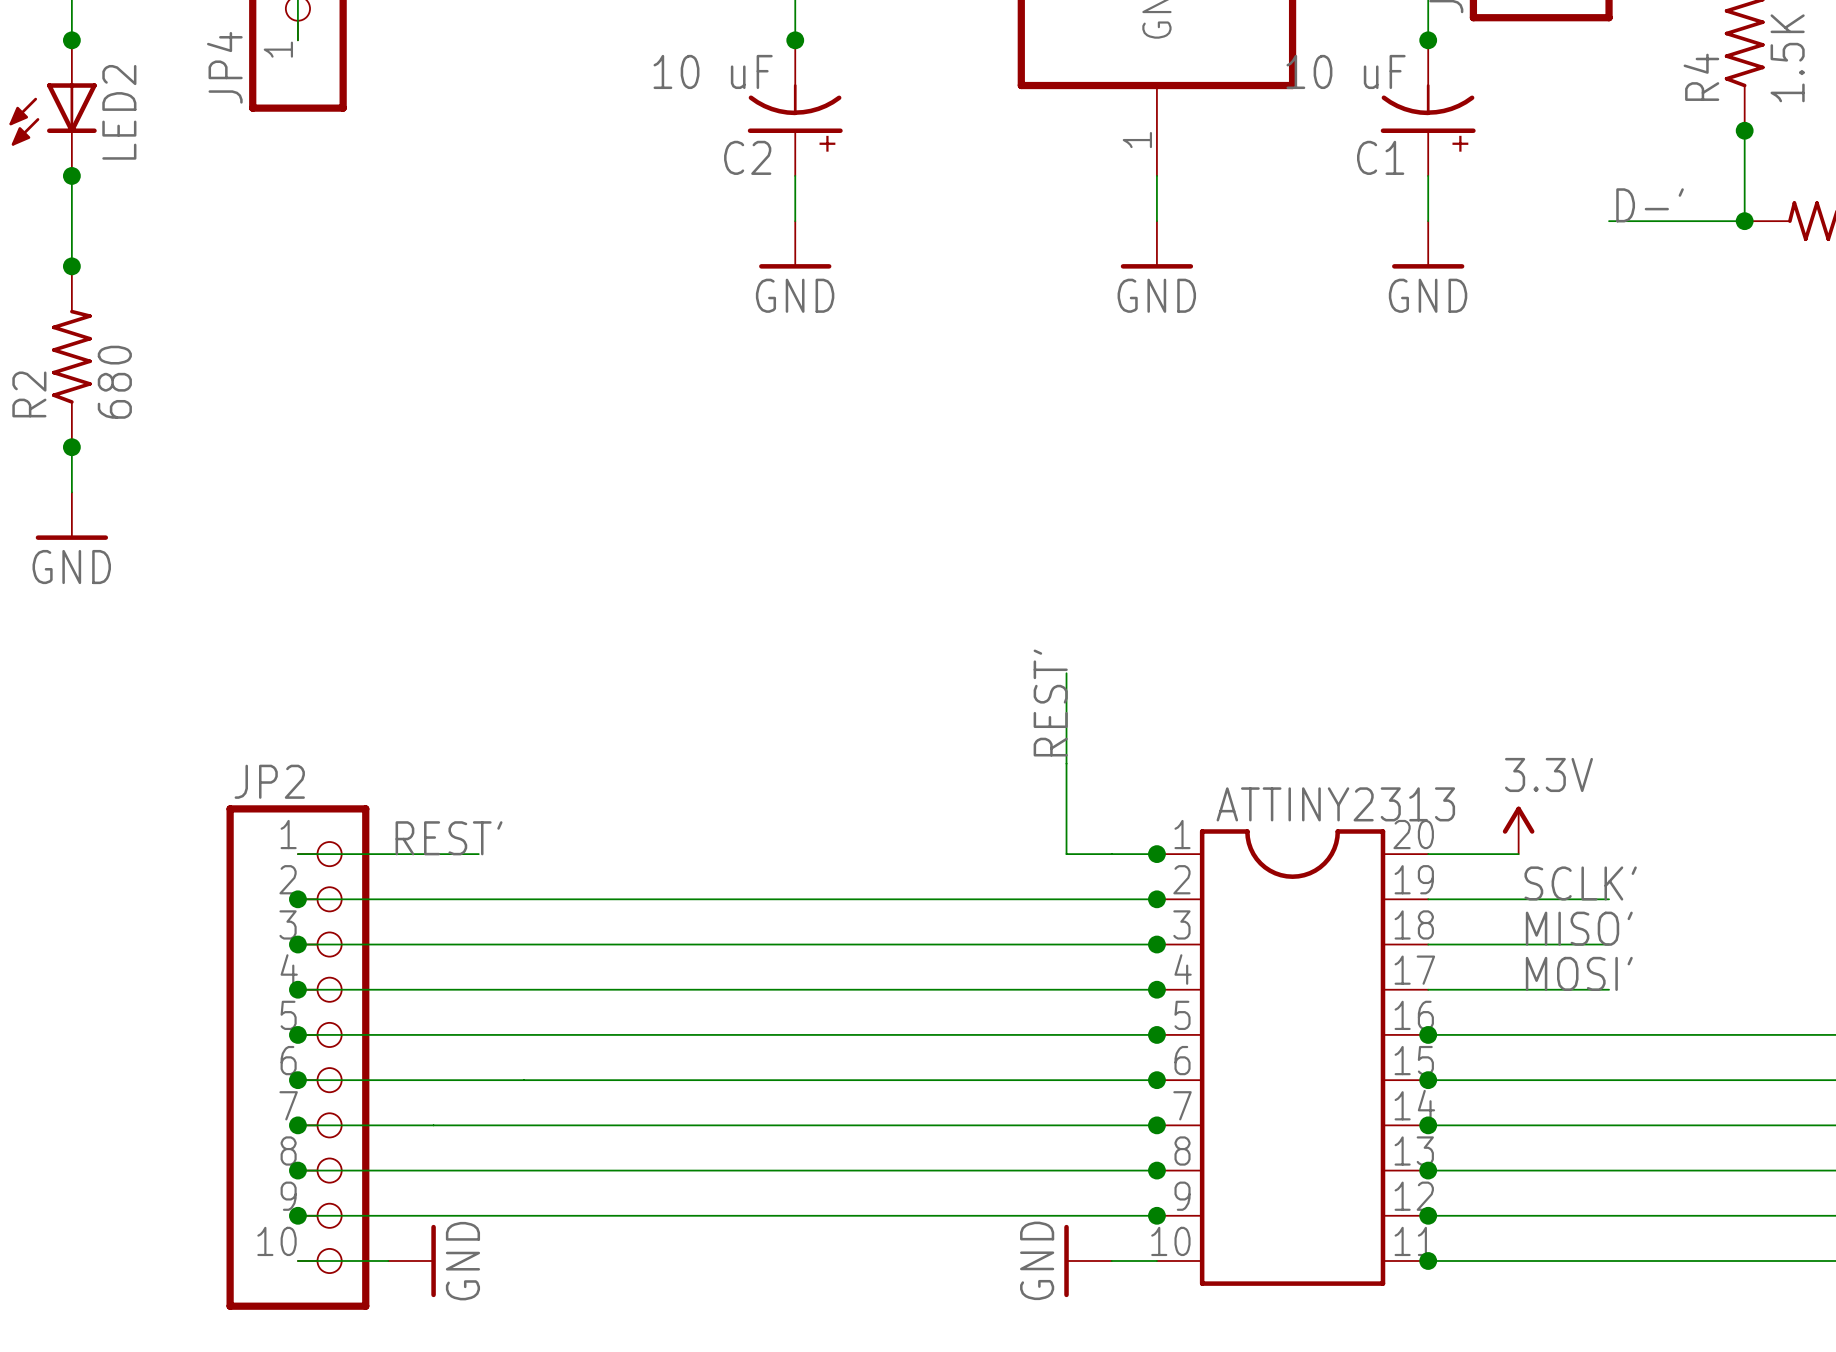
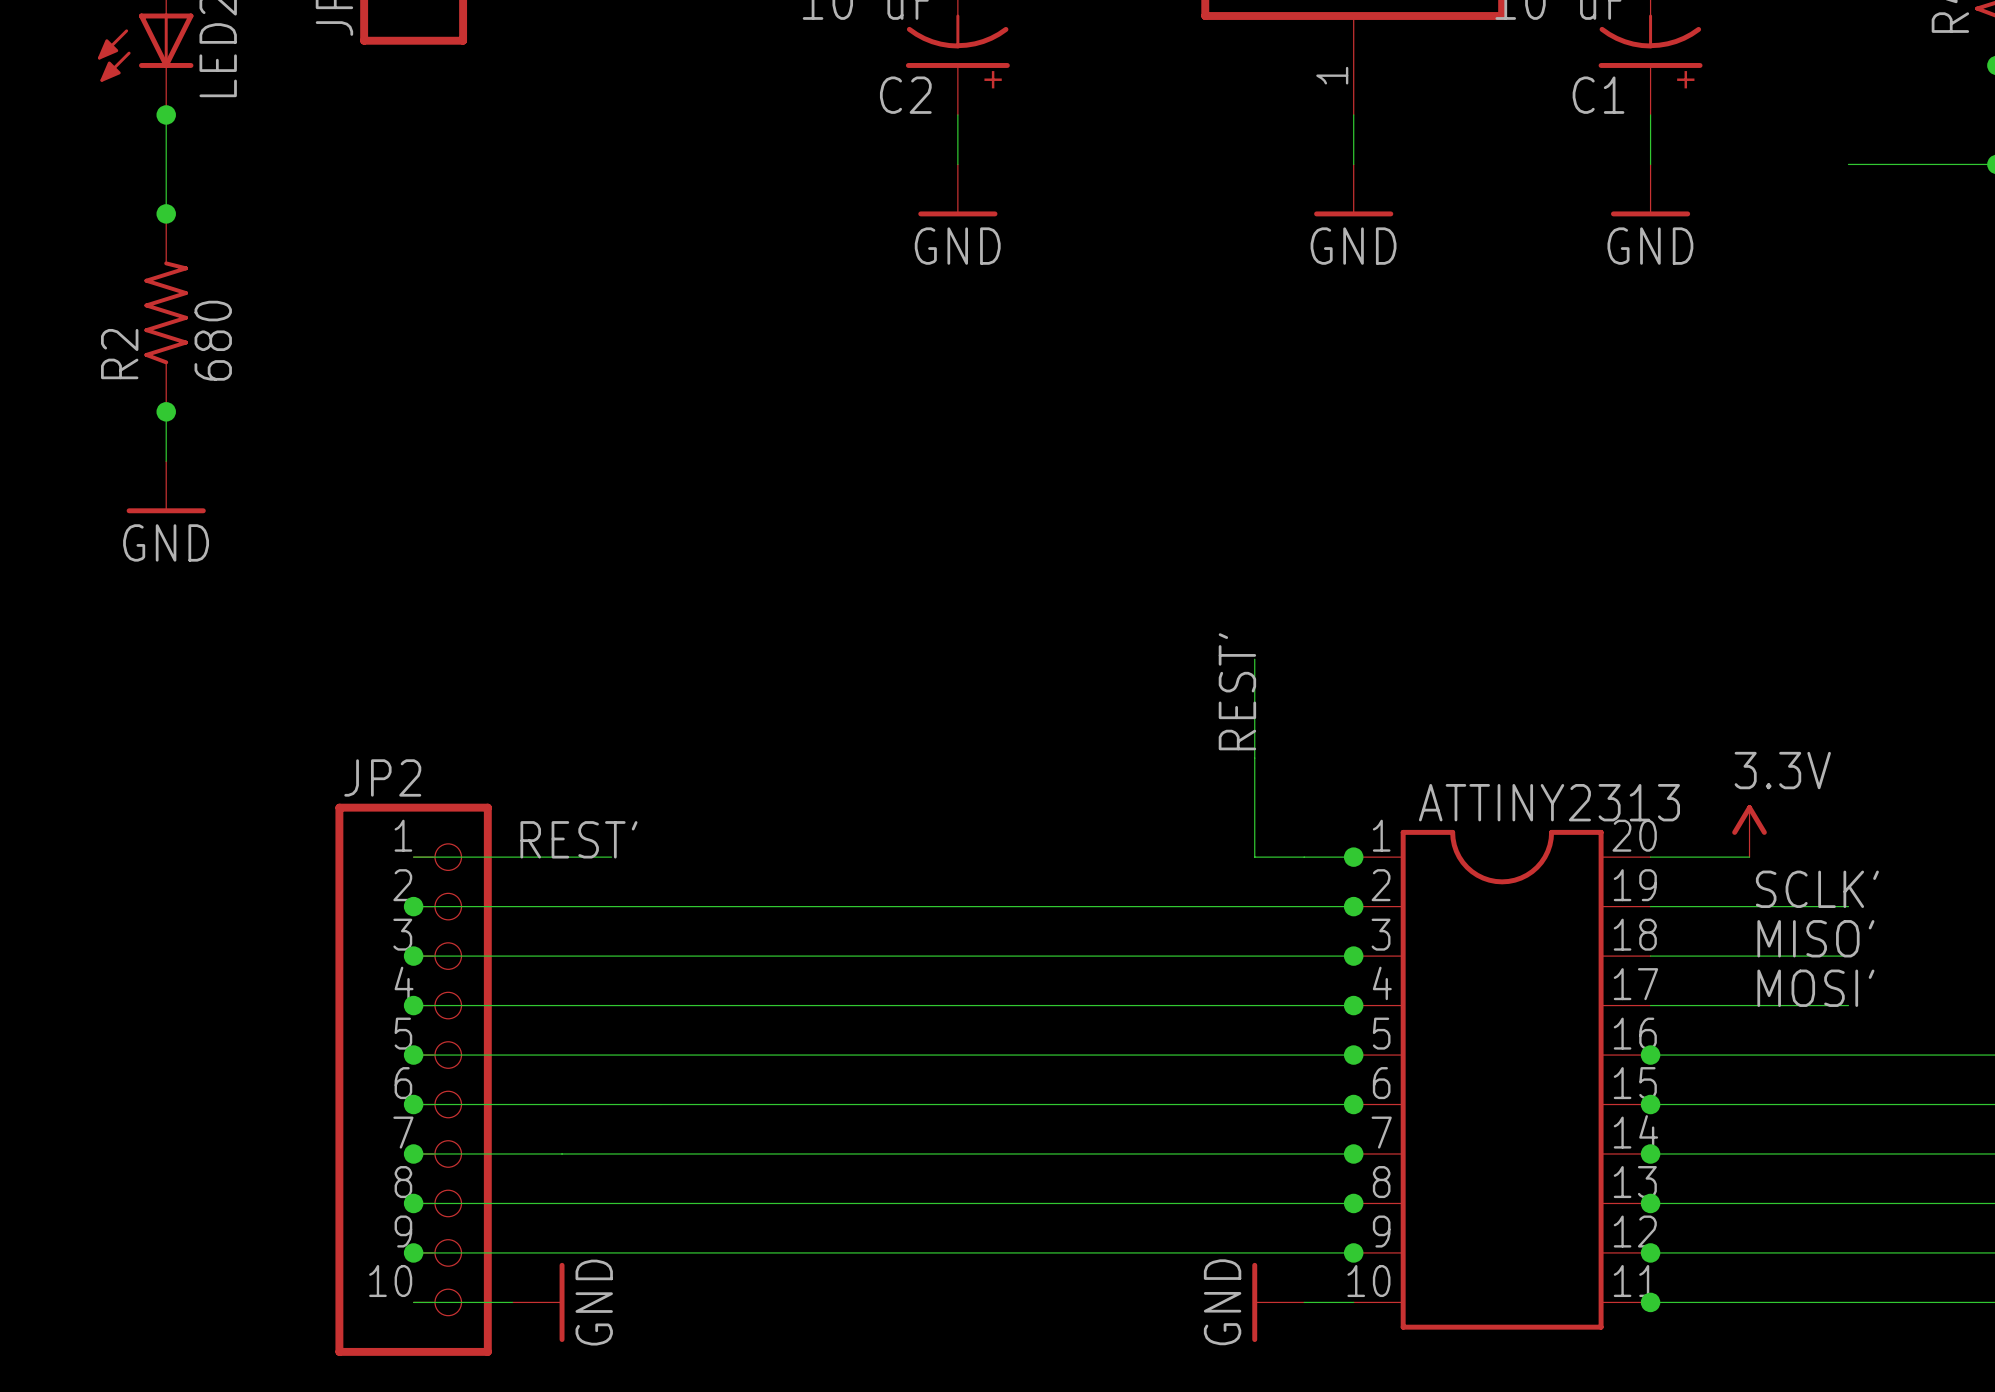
text: D-' (1650, 205) -> none

